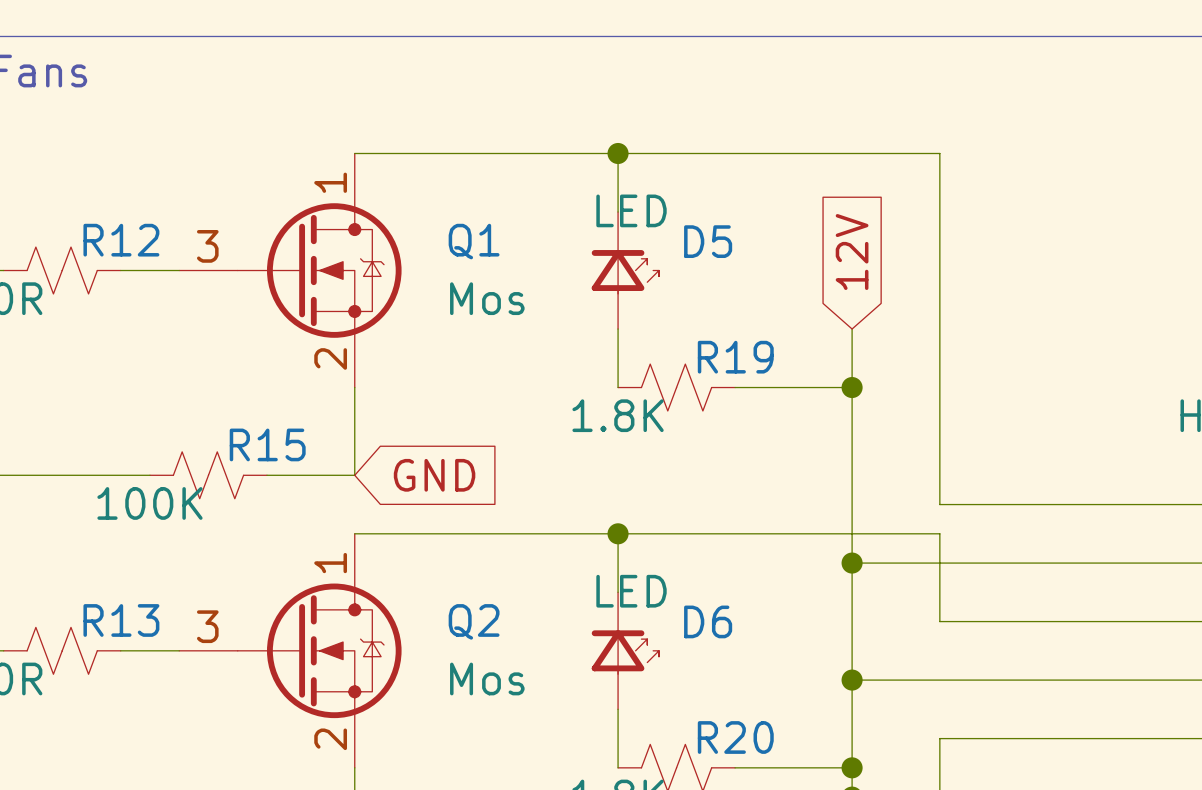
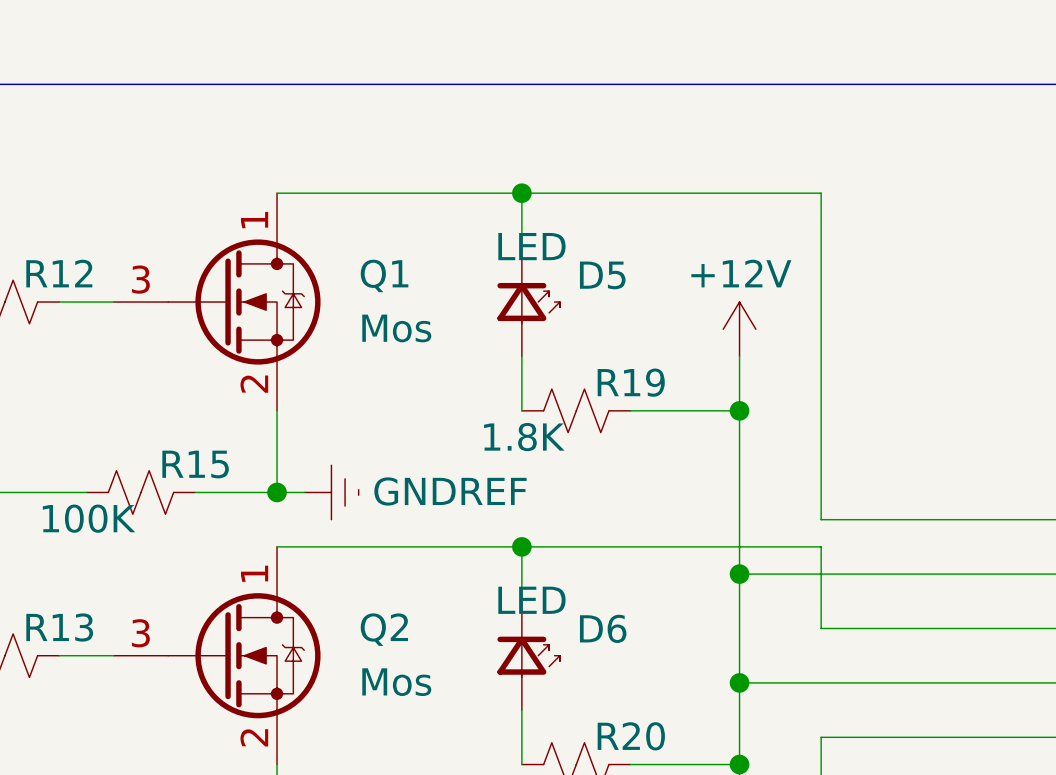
global label: 12V (852, 252) -> none
power symbol: none -> +12V (739, 329)
wire: none -> (277, 492) (304, 492)
junction: none -> (277, 492)
power symbol: none -> GNDREF (331, 492)
global label: GND (434, 475) -> none

